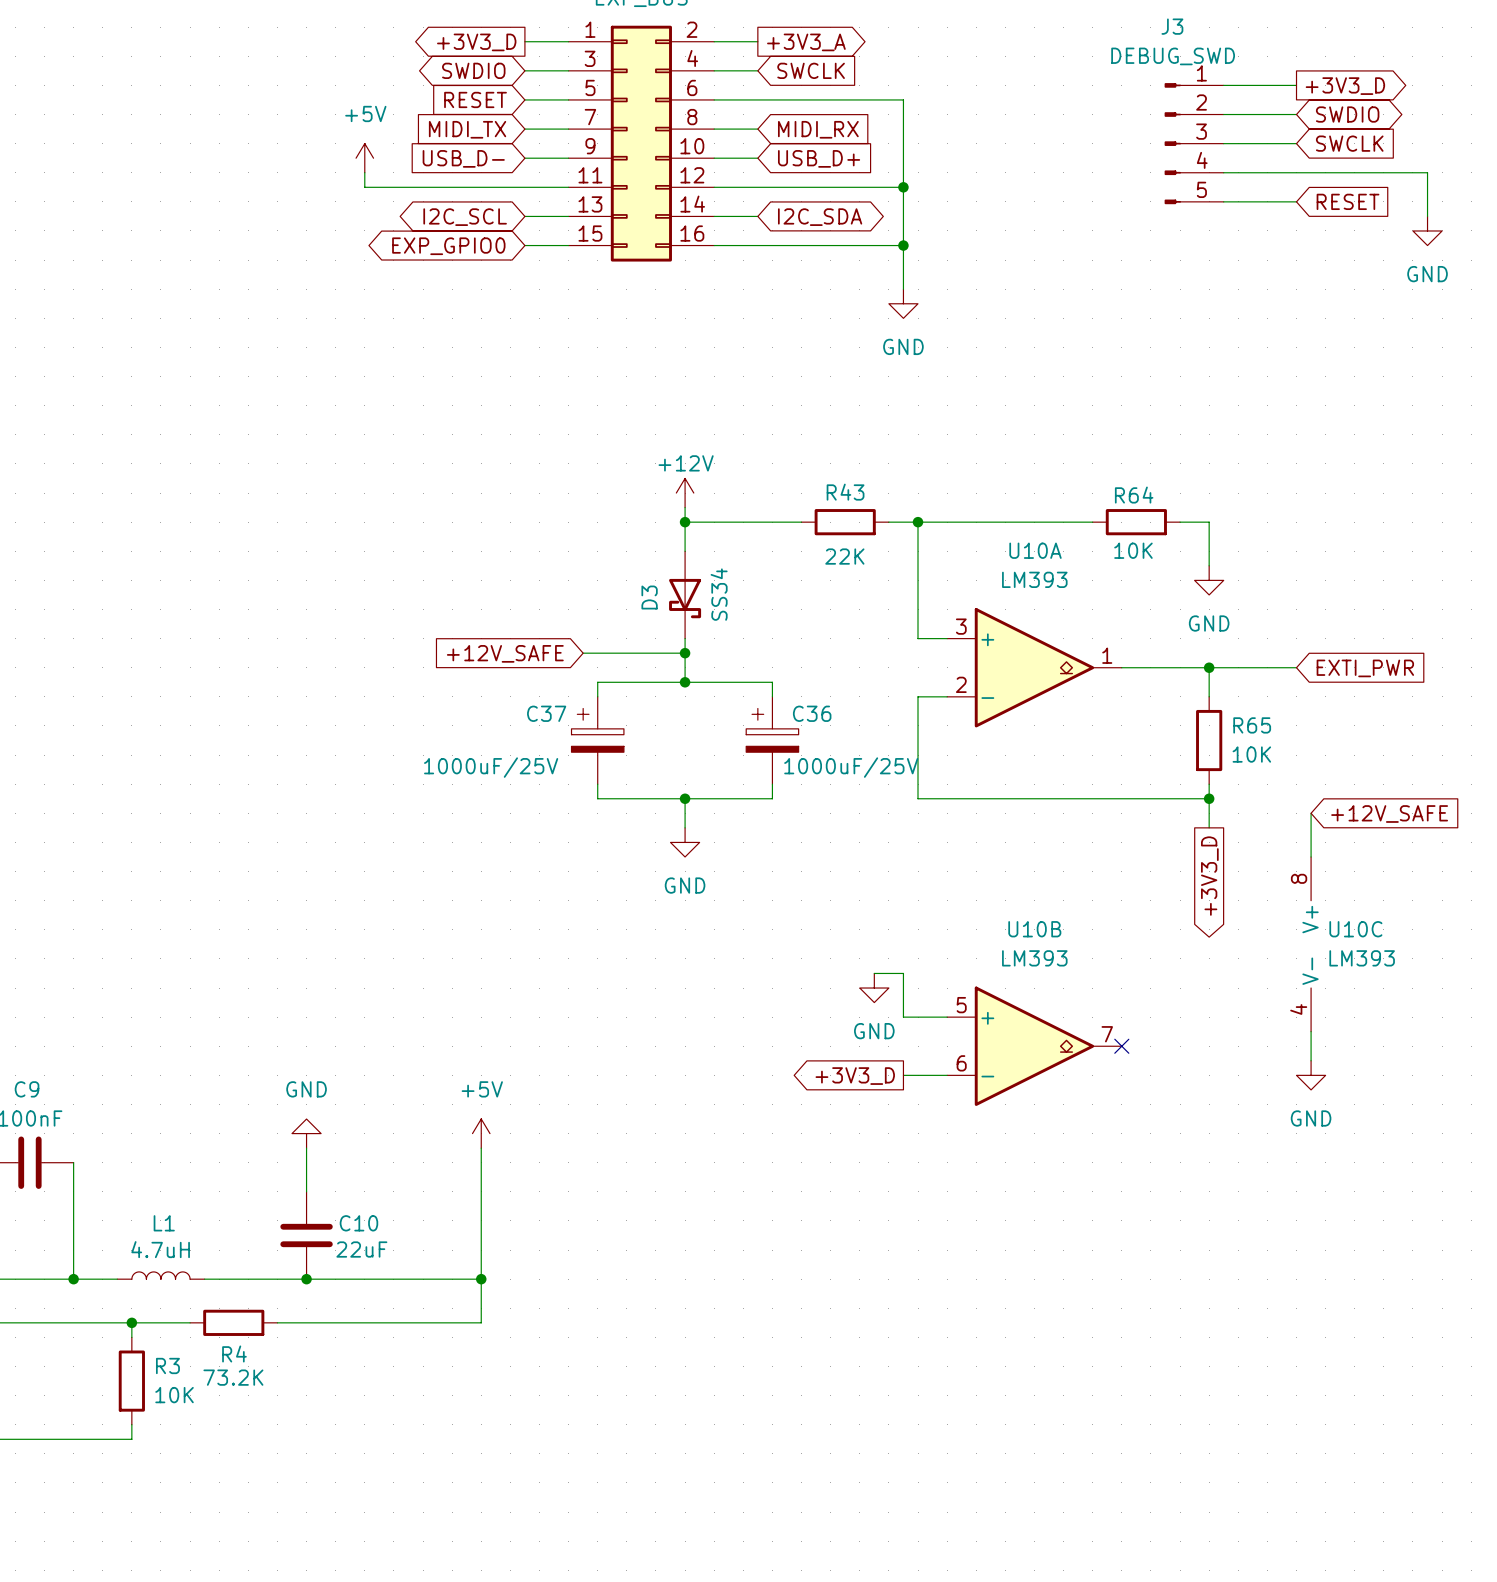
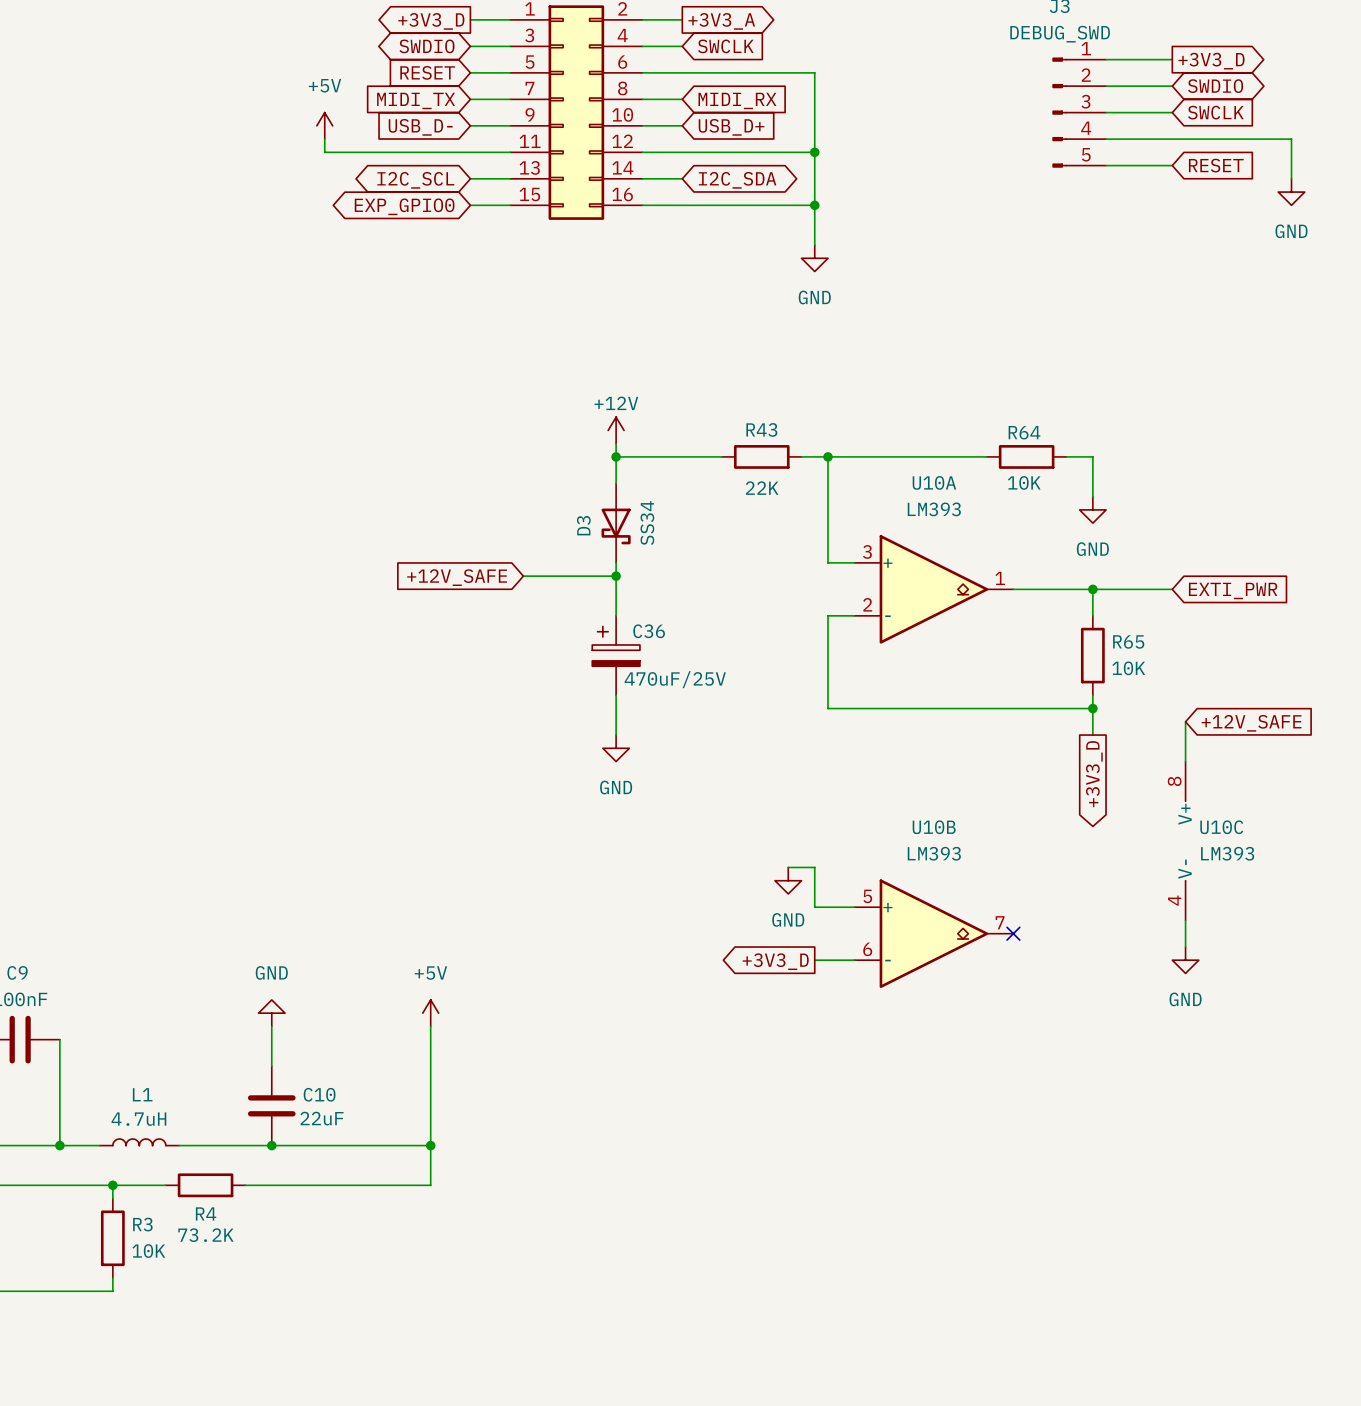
wire: none -> (616, 602) (616, 615)
junction: (685, 682) -> none
wire: (597, 696) (597, 682) (772, 682) (772, 696) -> none
C37: 1000uF/25V (597, 740) -> none
C36 position: (772, 740) -> (616, 655)
C36 value: 1000uF/25V (851, 767) -> 470uF/25V (675, 679)
wire: (597, 784) (597, 798) (772, 798) (772, 784) -> none
wire: none -> (616, 695) (616, 708)
junction: (685, 798) -> none

